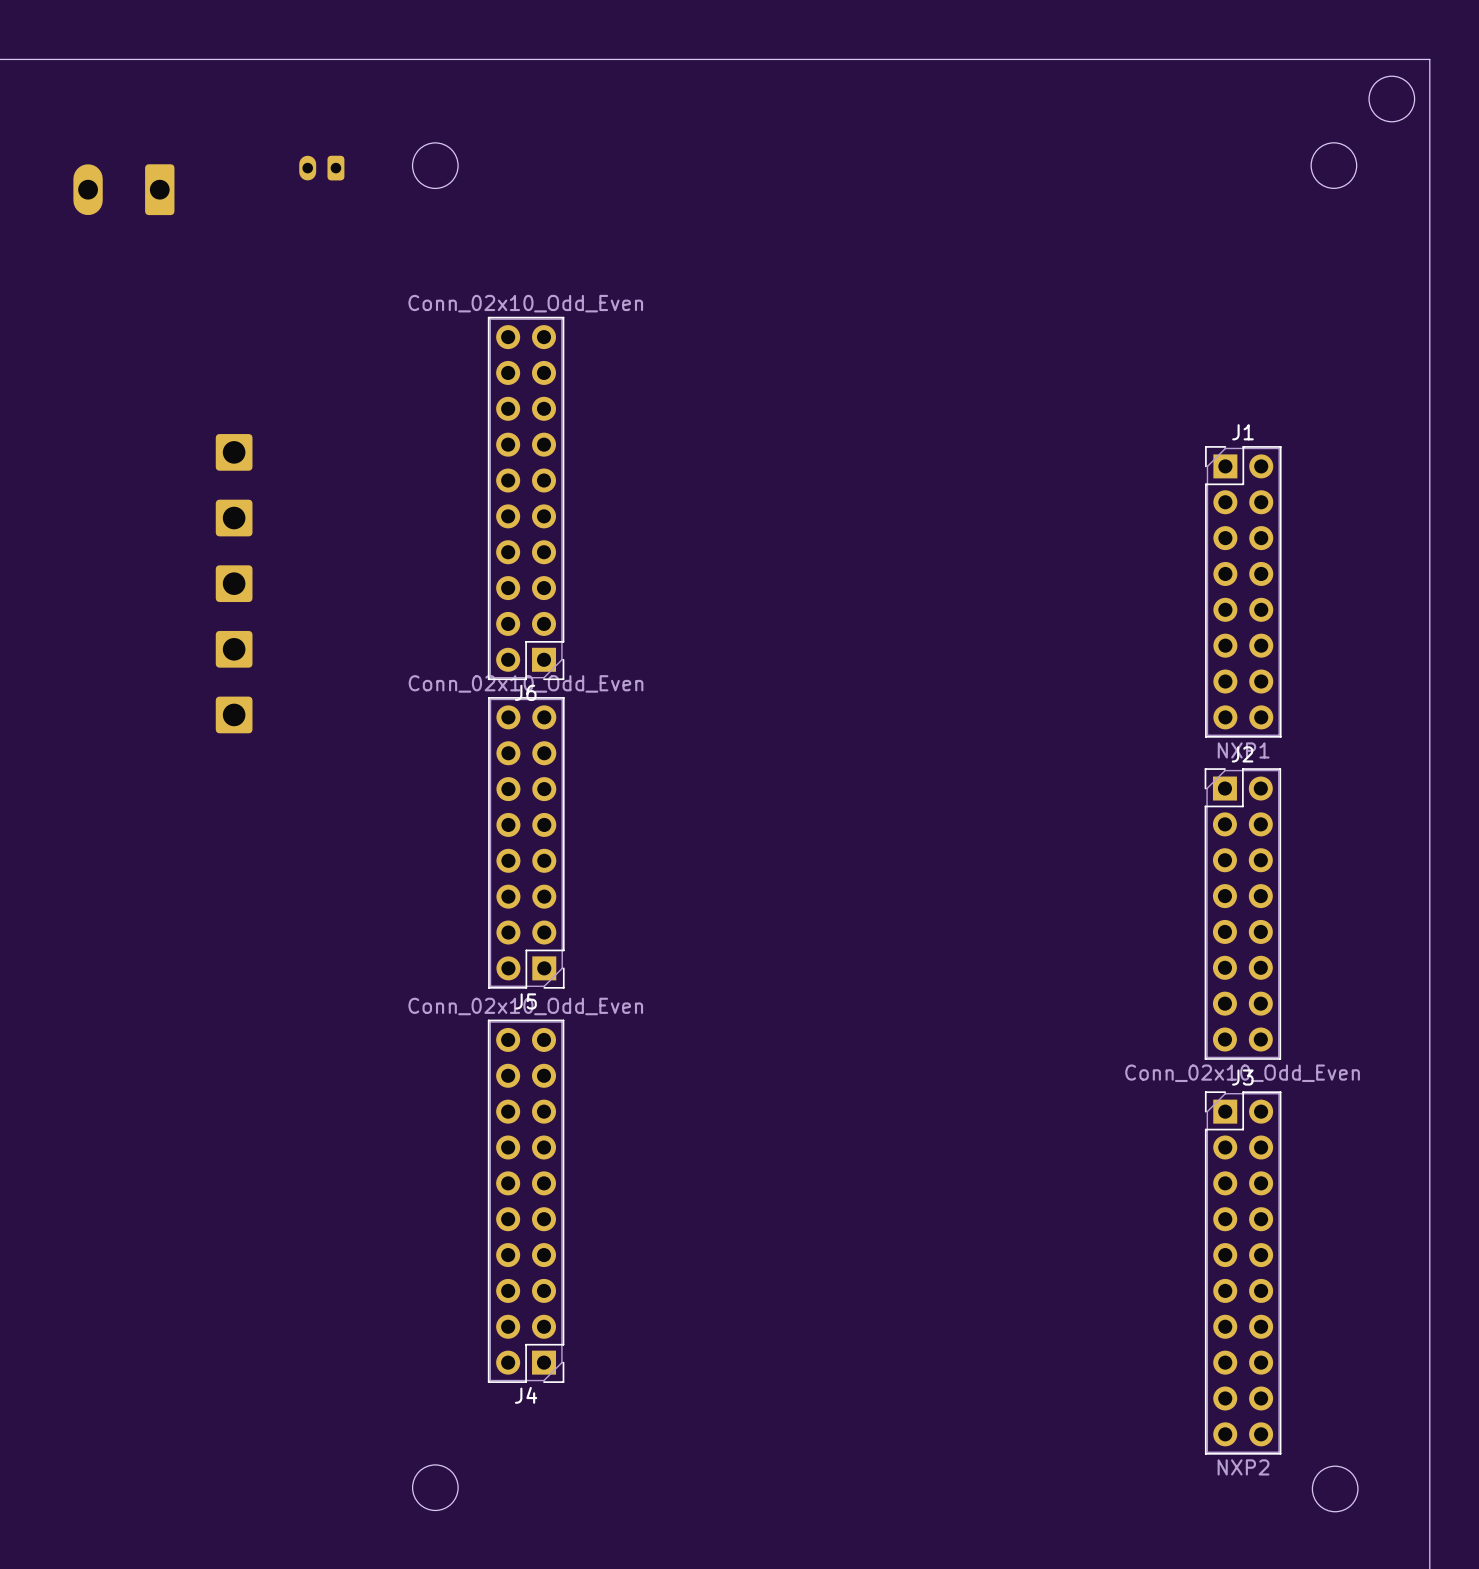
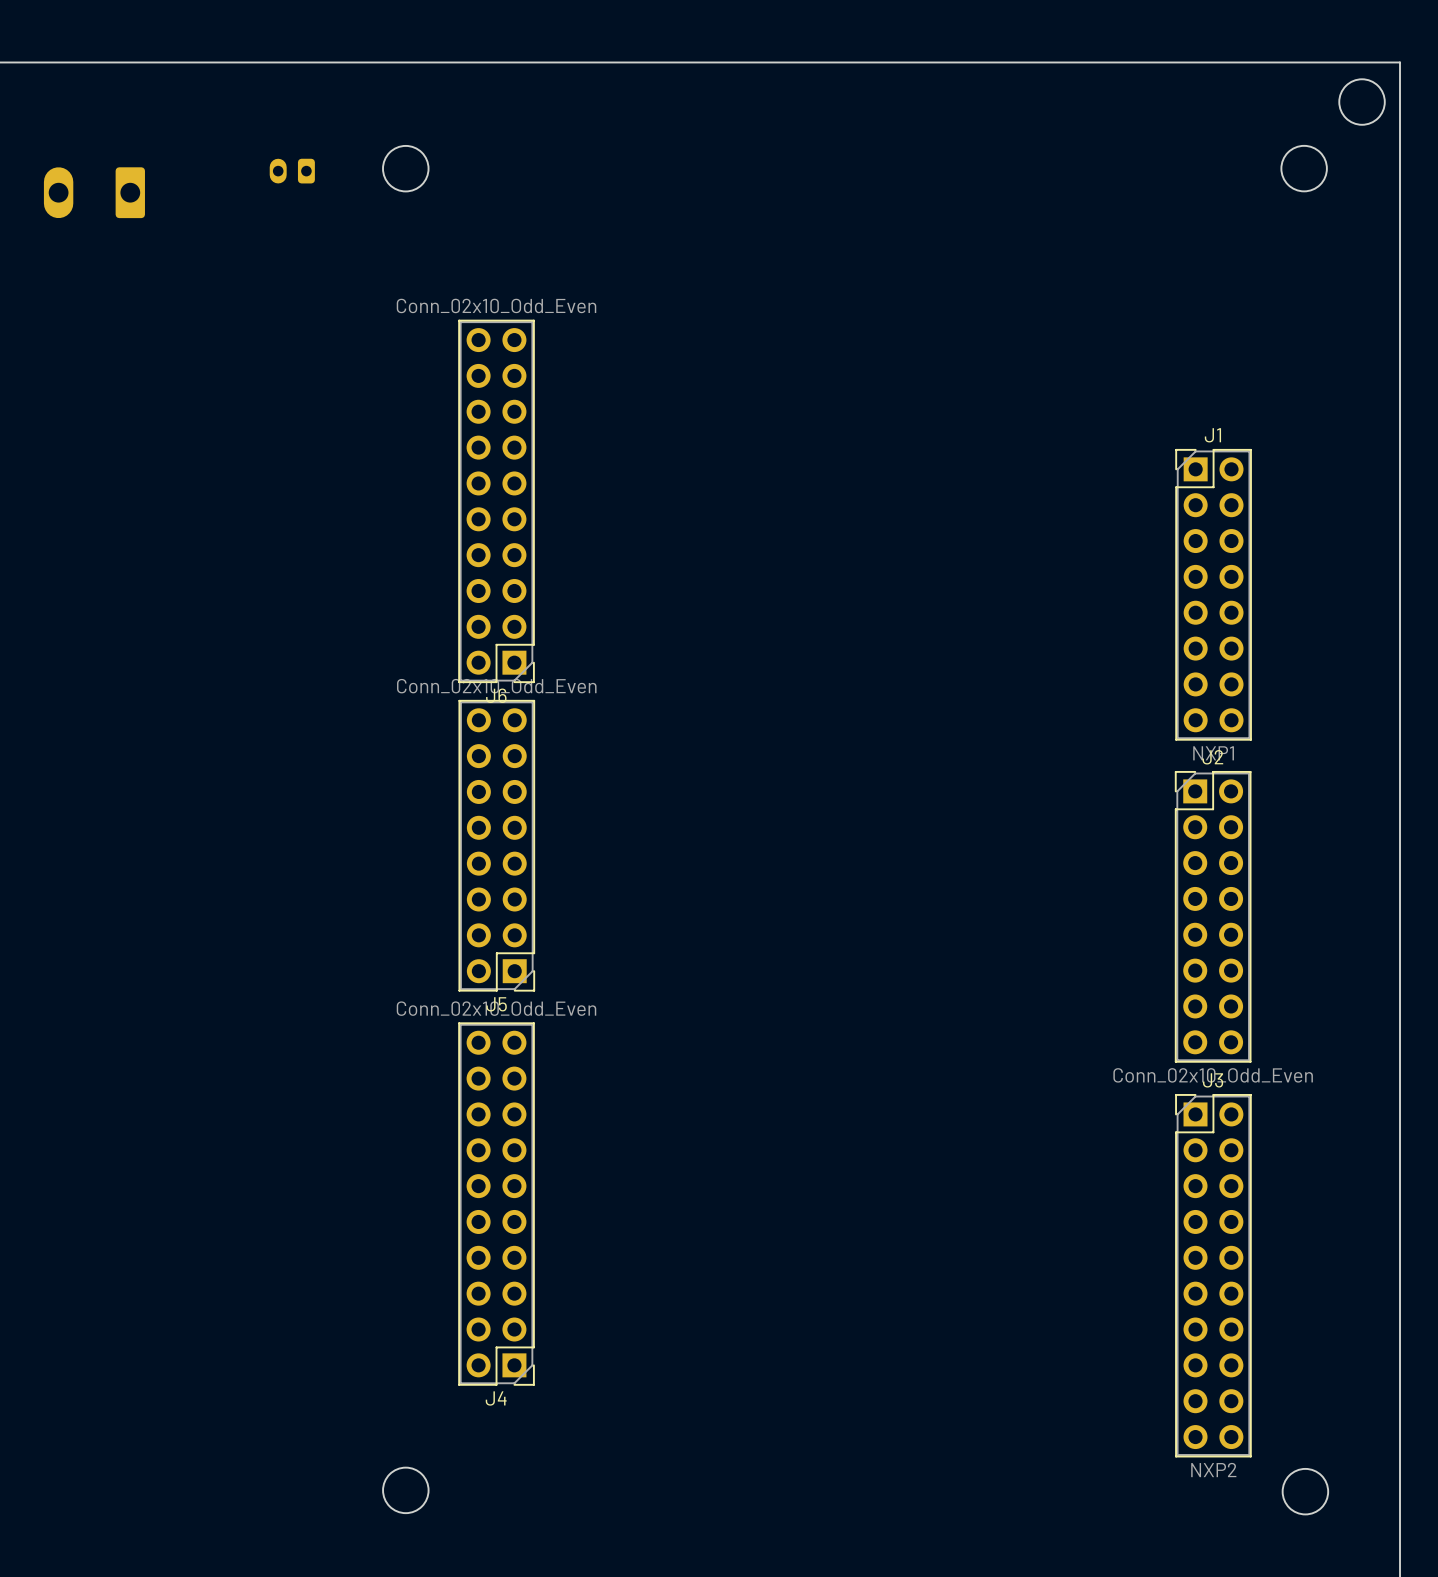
part: (234, 452) -> none
part: (234, 518) -> none
part: (234, 583) -> none
part: (234, 649) -> none
part: (234, 714) -> none

